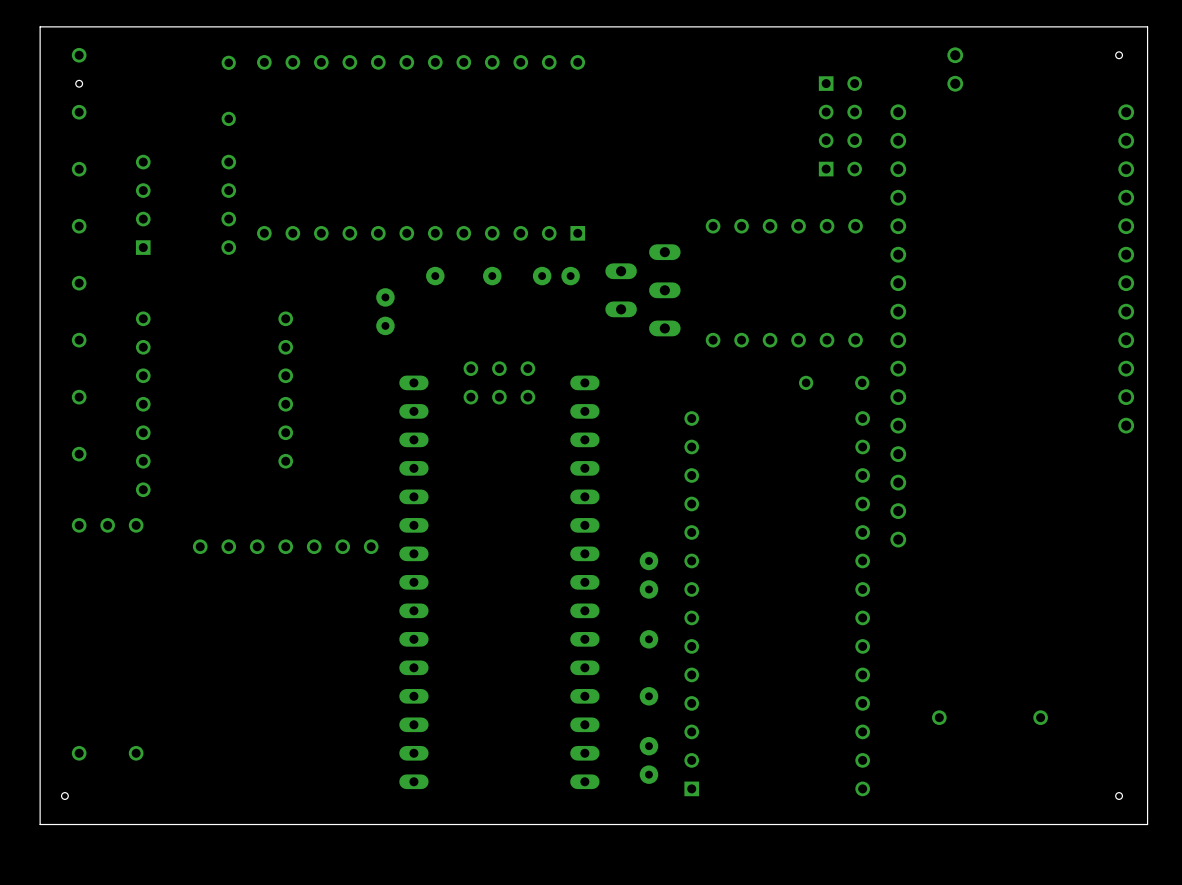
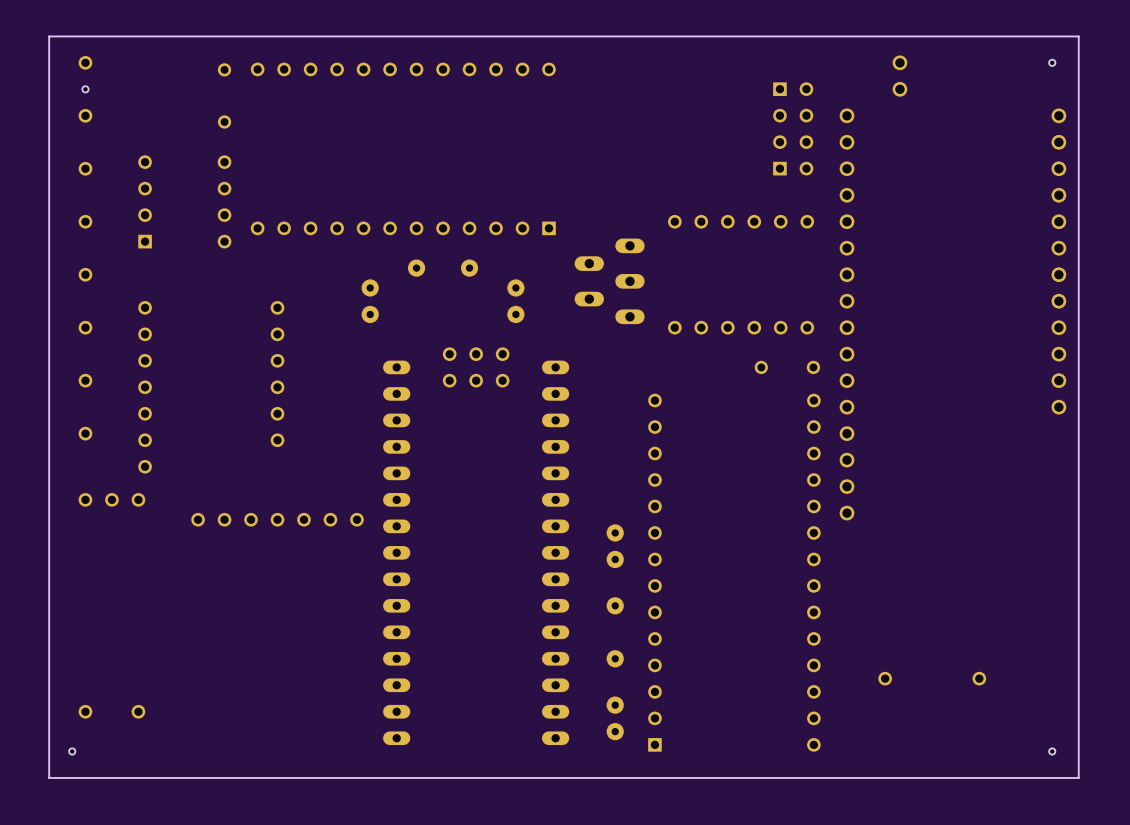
part rotation: 0° (556, 276) -> 90° clockwise (515, 301)
part position: (556, 276) -> (515, 301)

